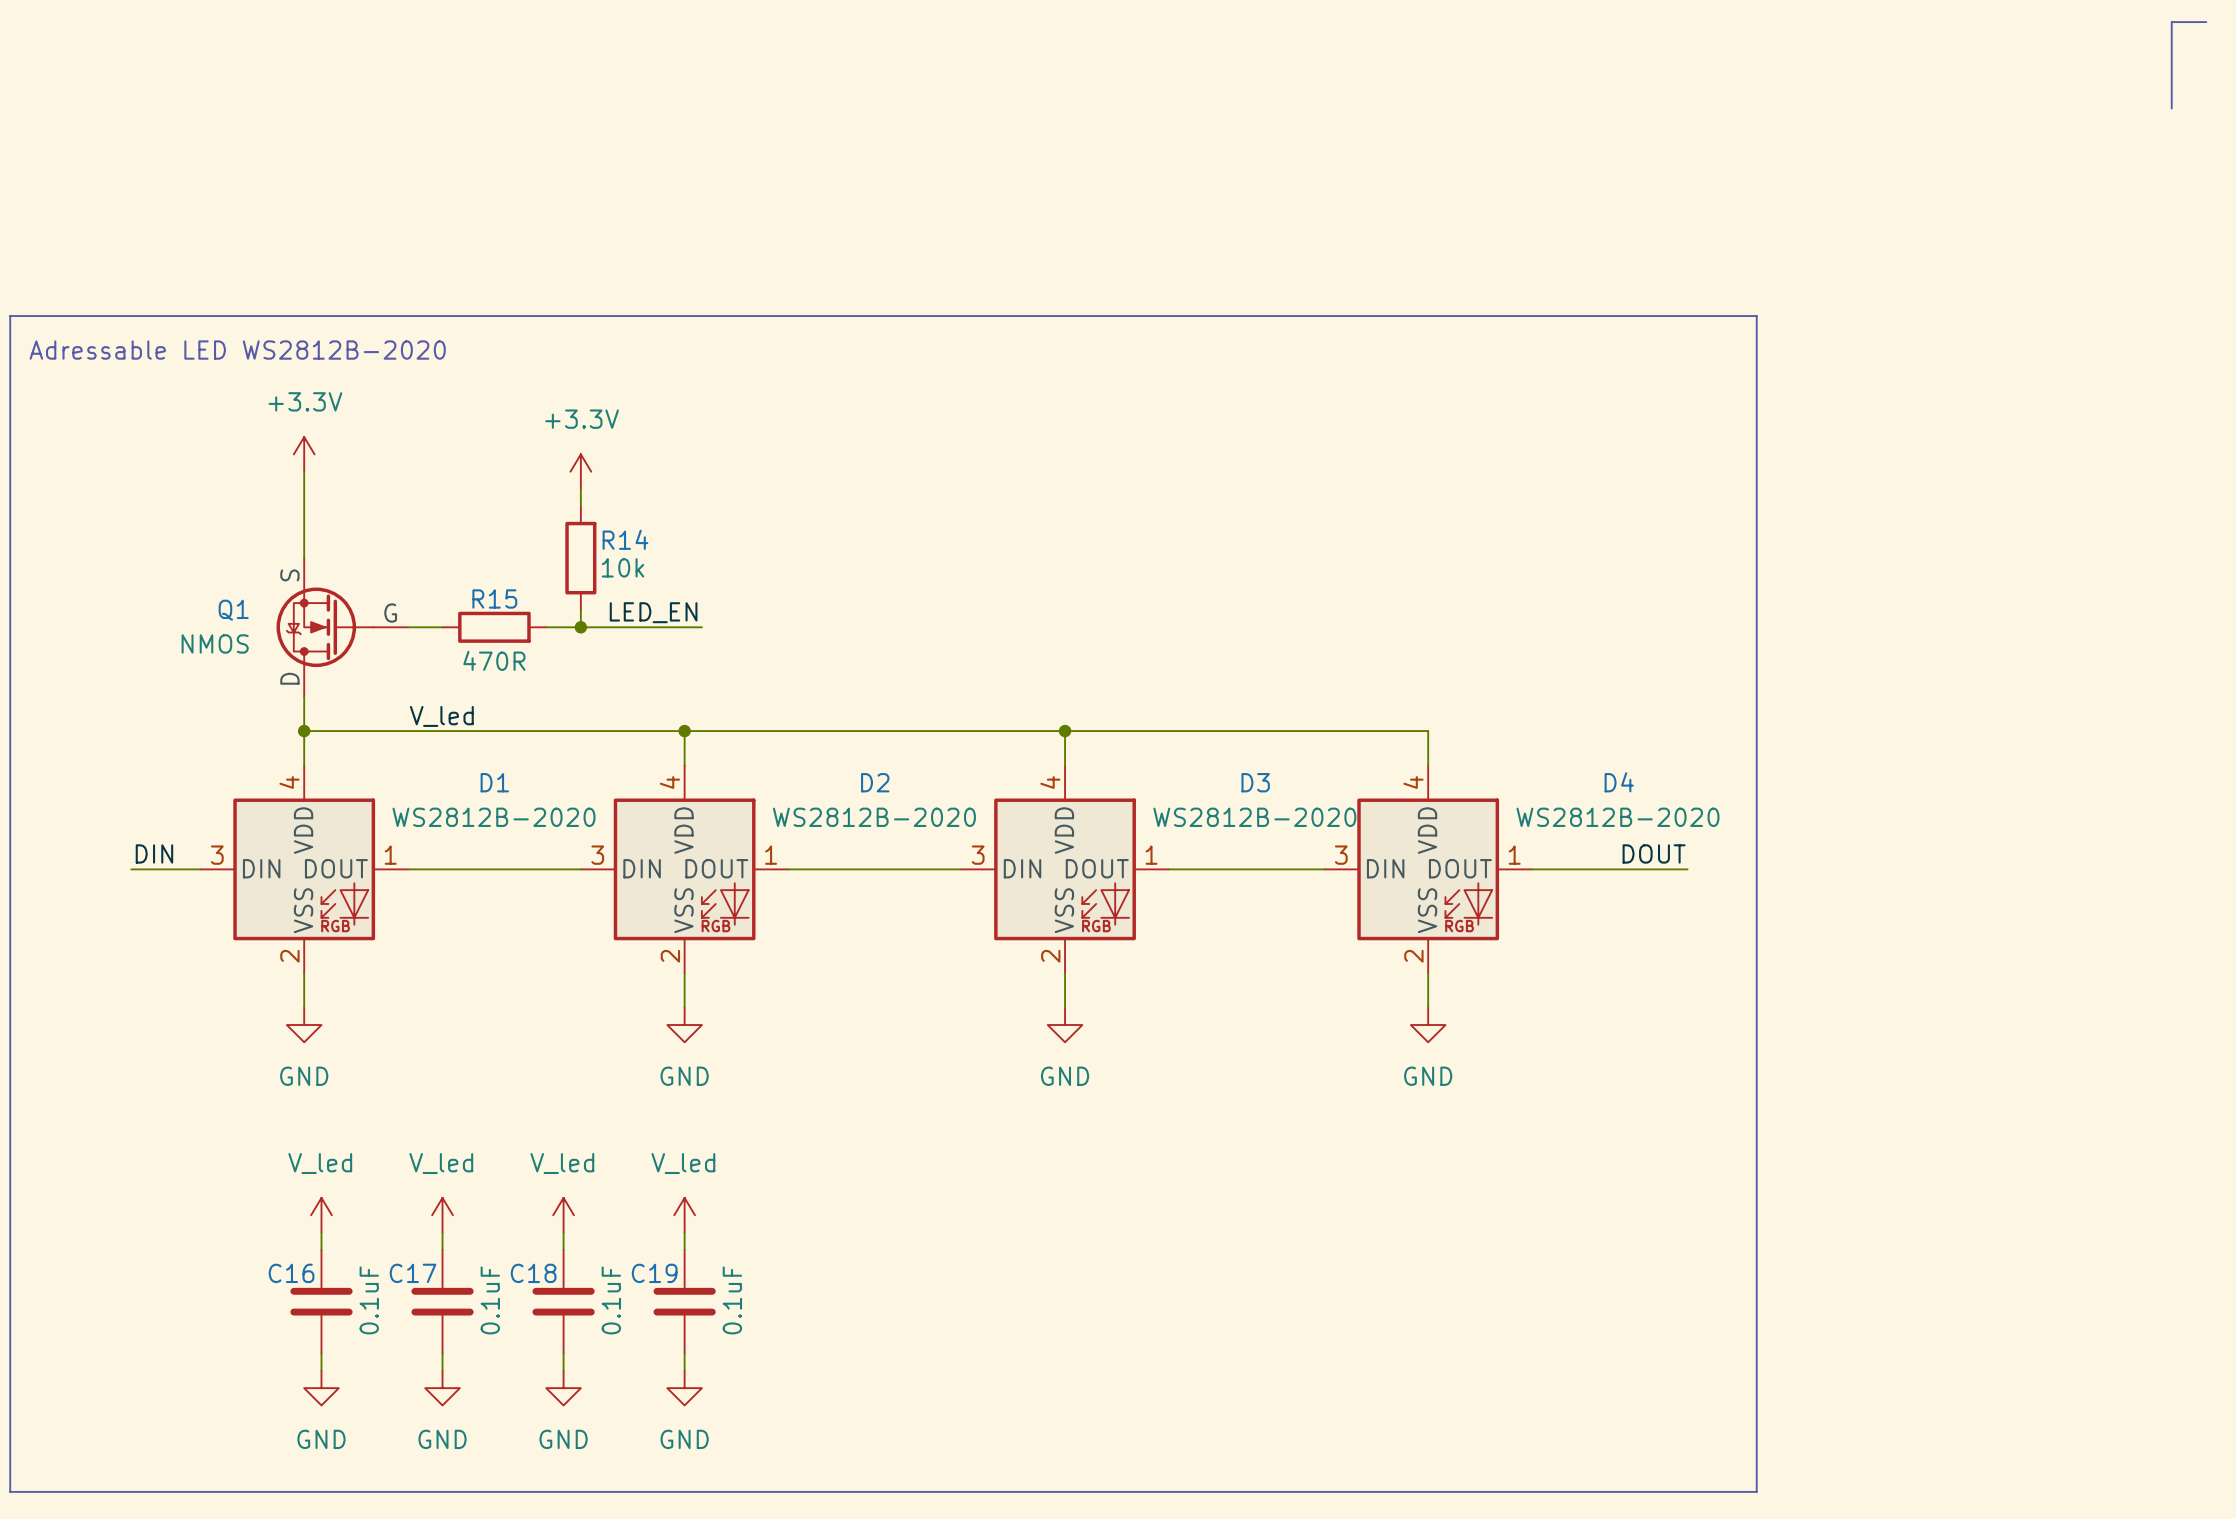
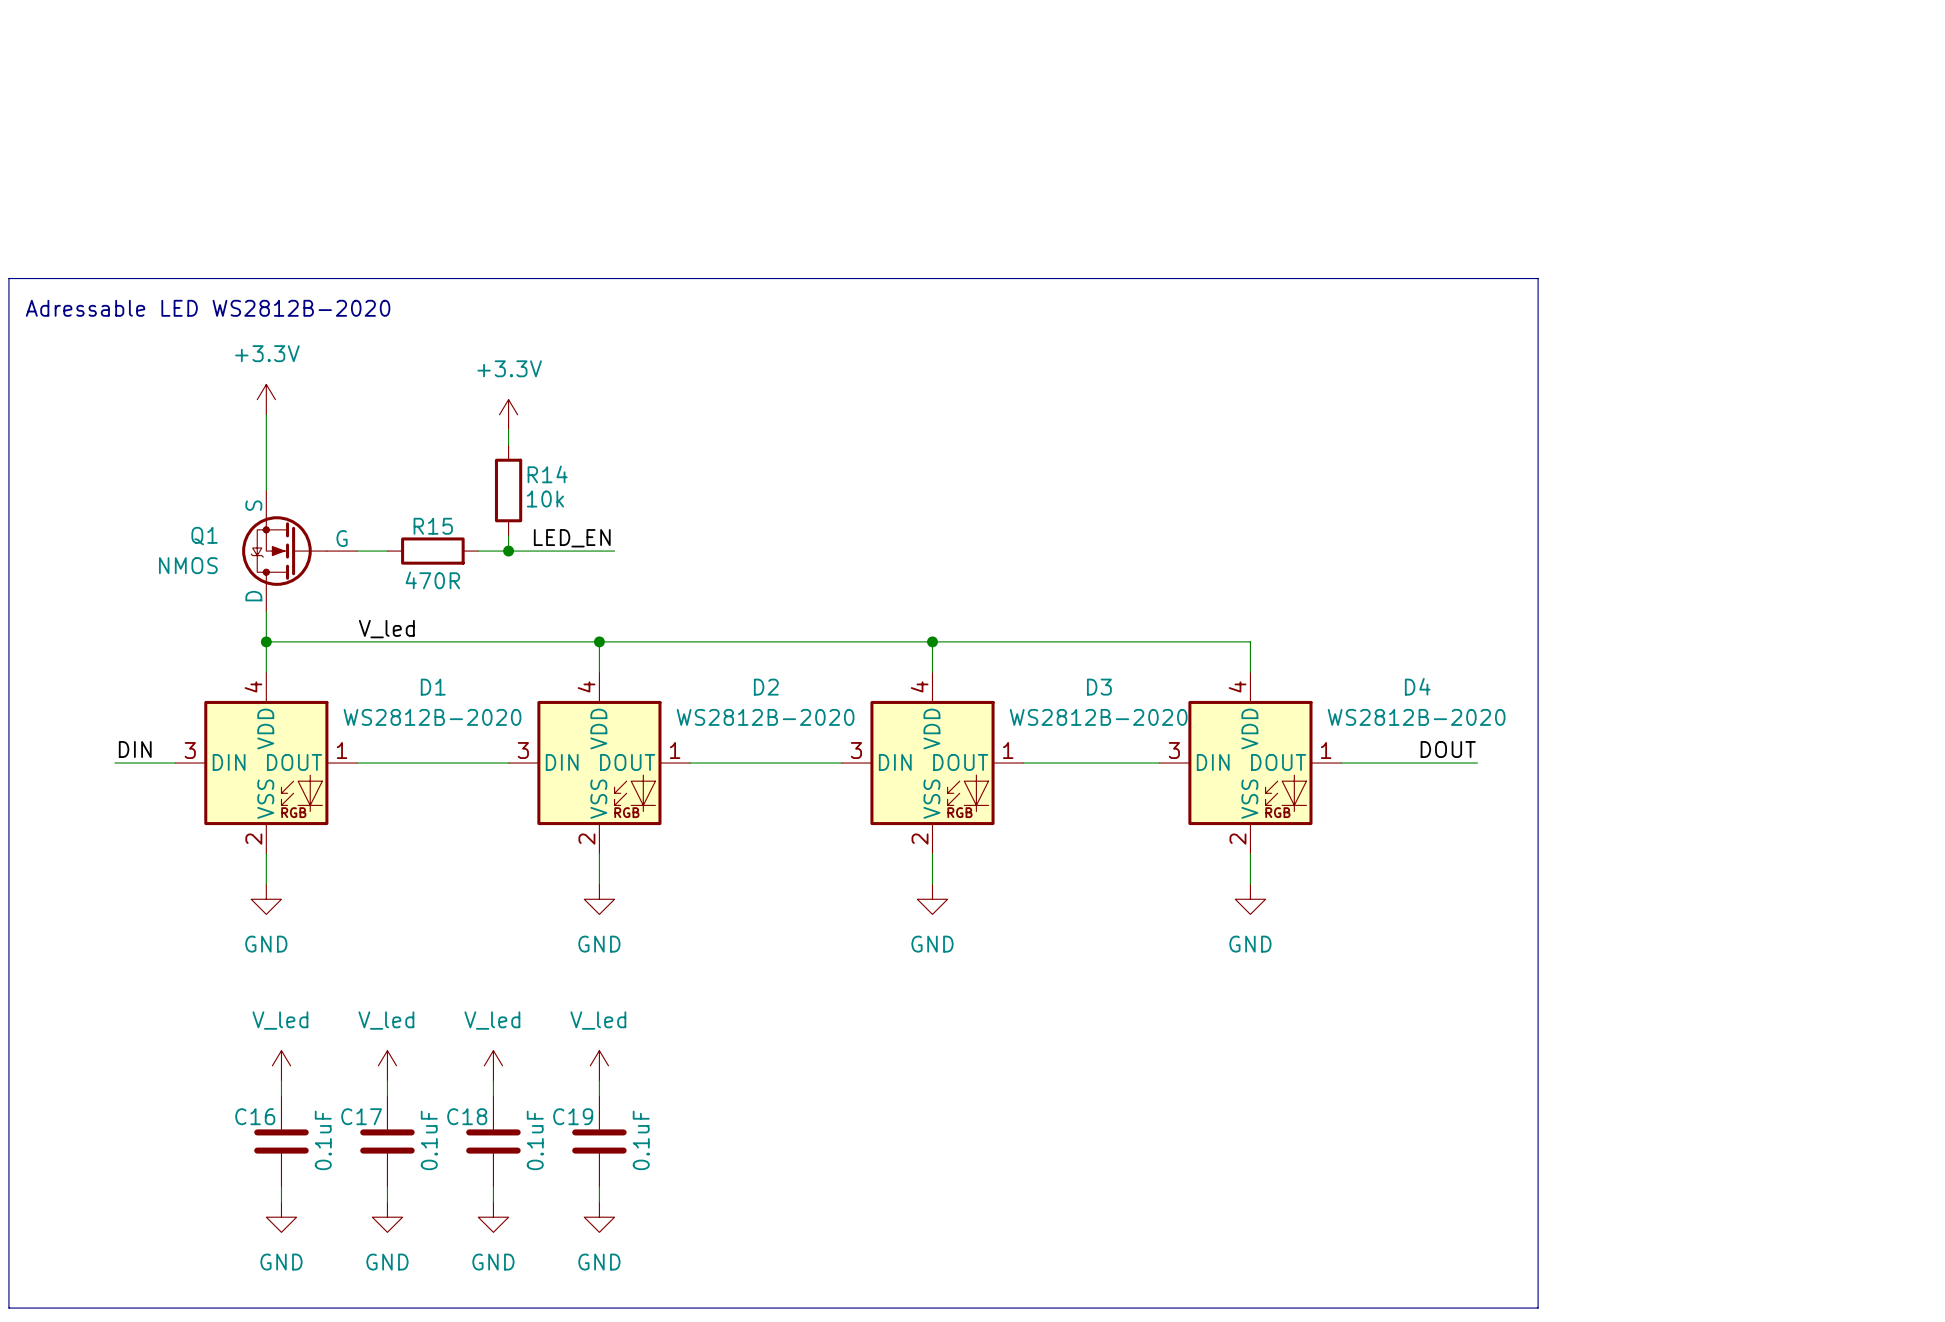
bus: (2206, 22) (2171, 22) (2171, 108) -> none

